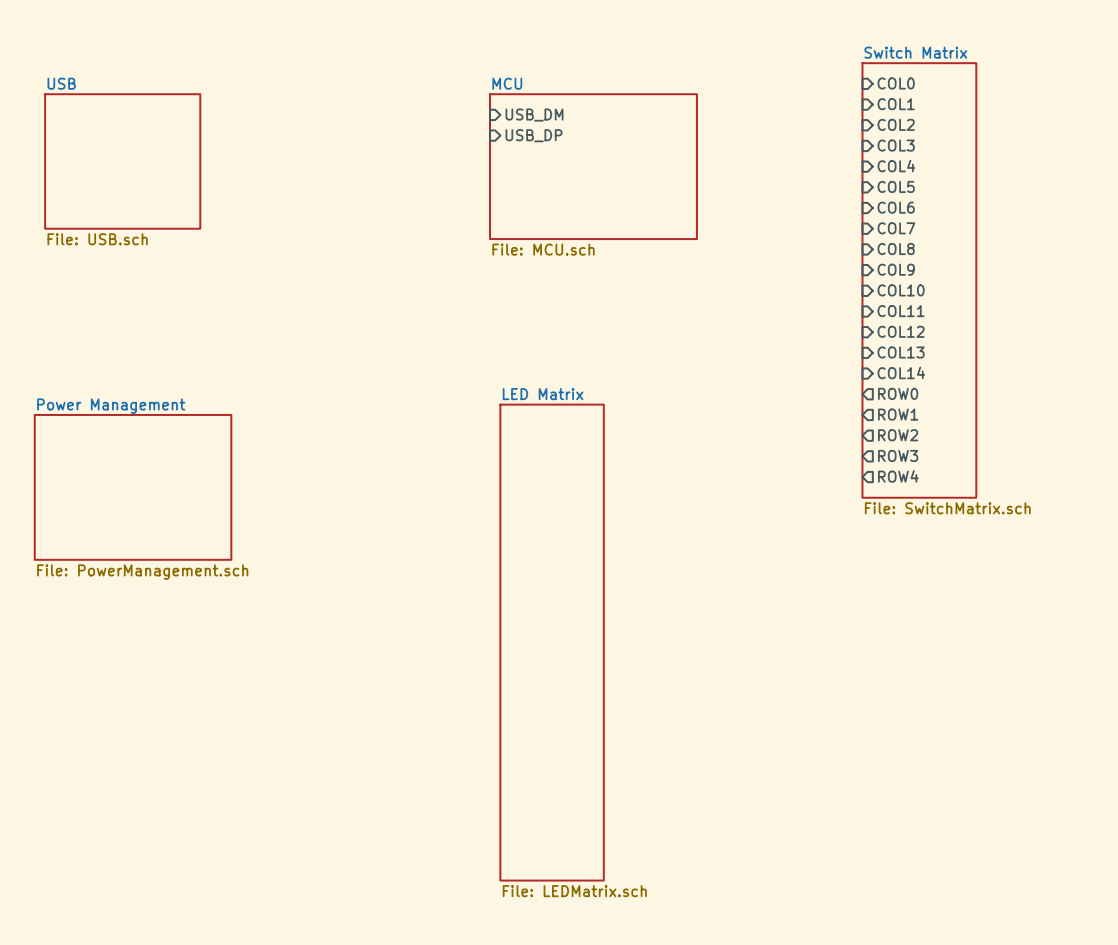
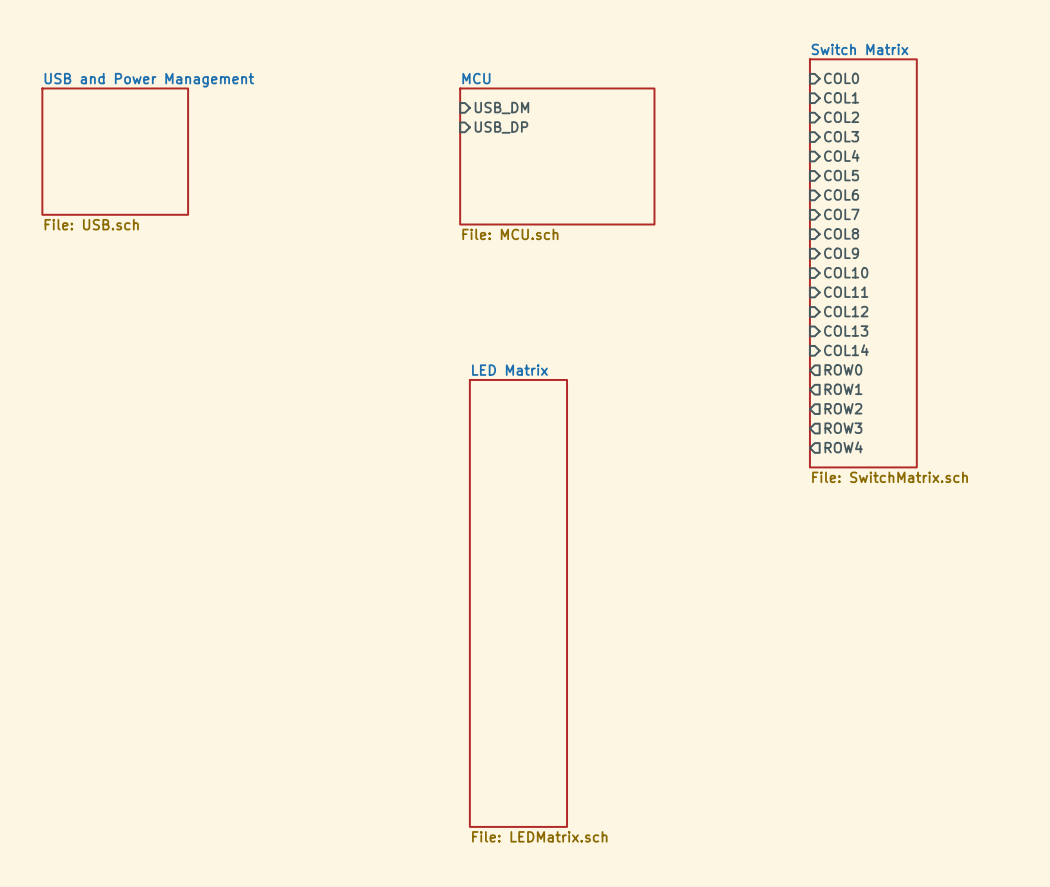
sheet USB name: USB (61, 83) -> USB and Power Management (149, 80)
sheet Power Management: File: PowerManagement.sch (133, 487) -> none

